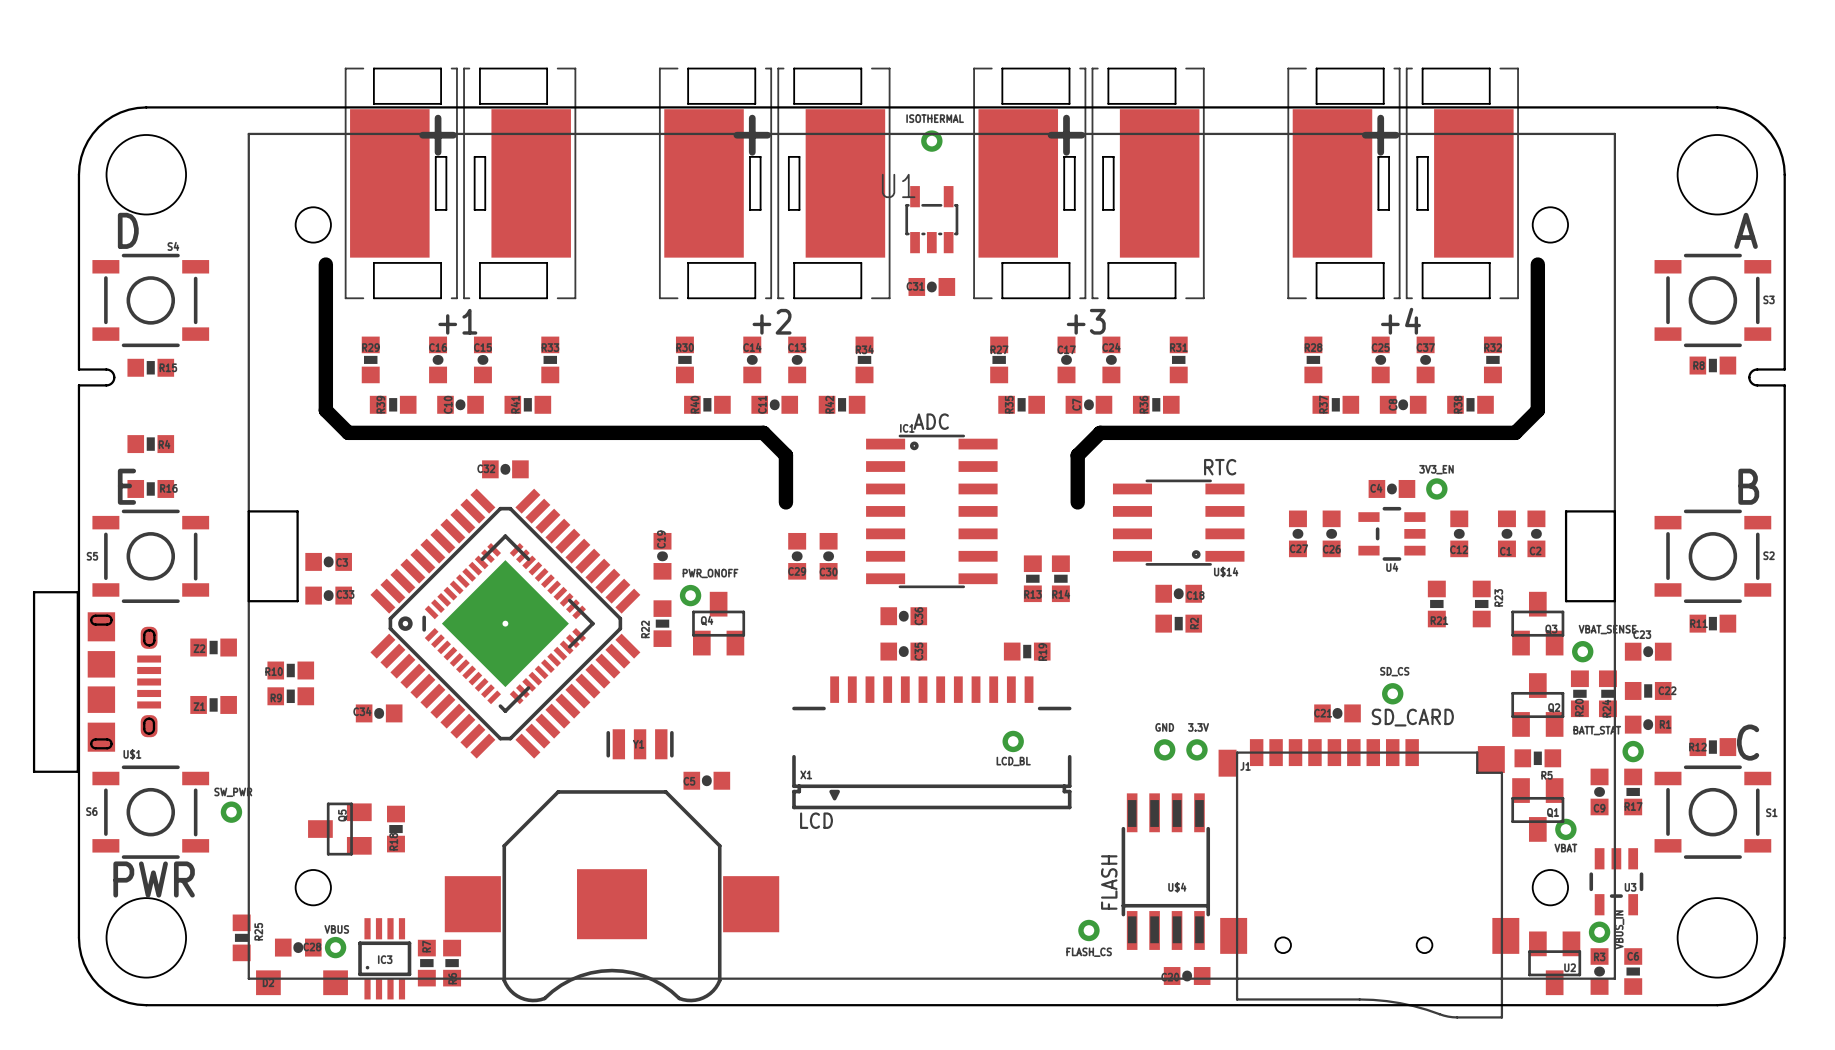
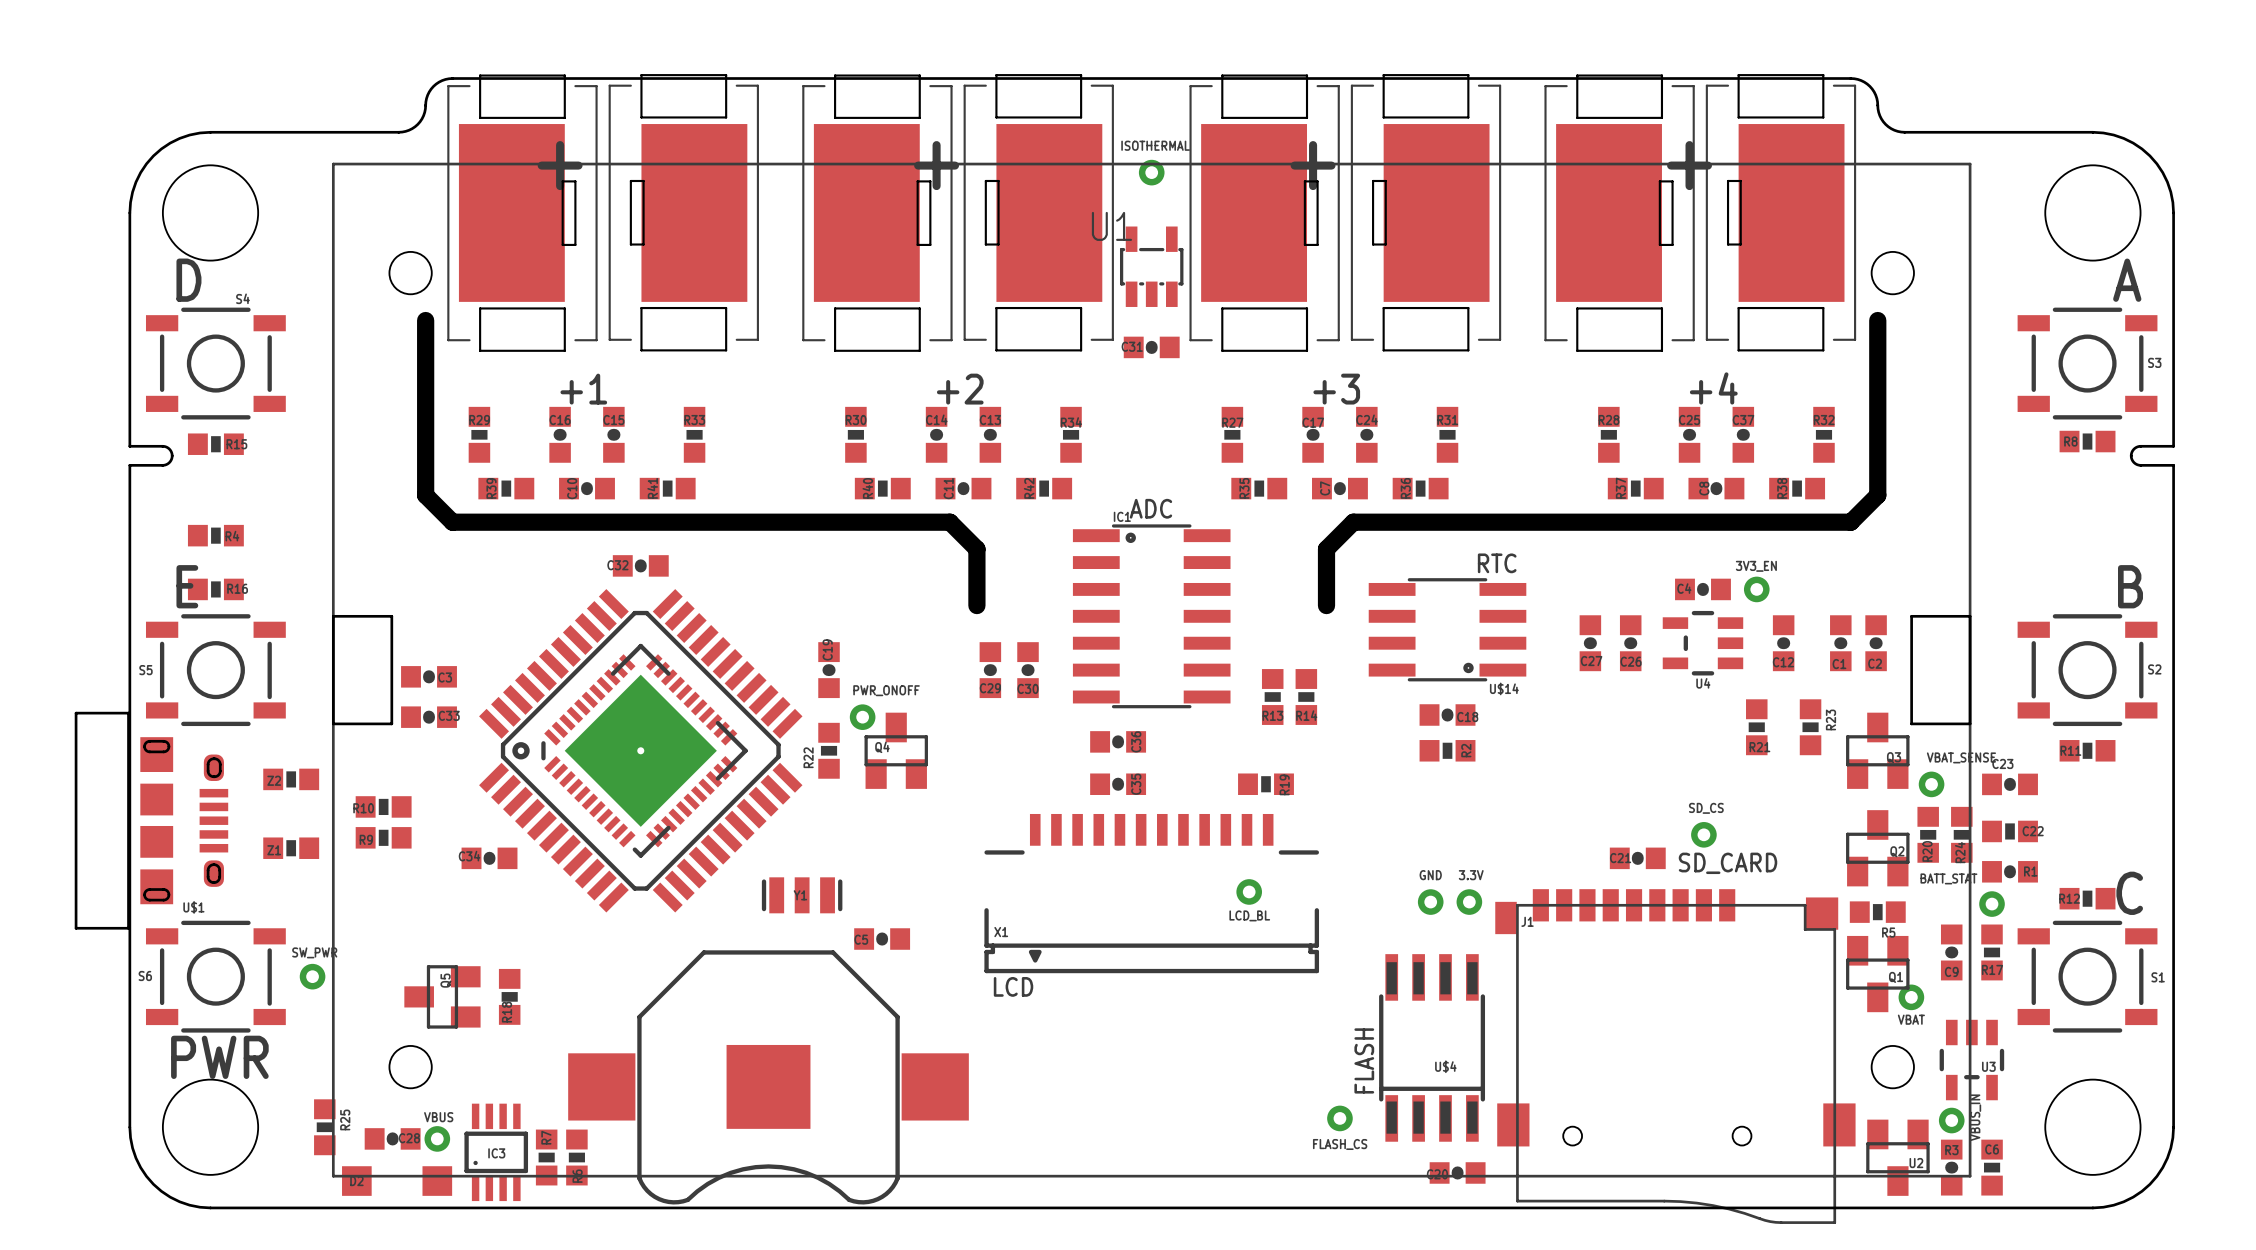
board edge: (303, 107) (1560, 107) -> (398, 132) (409, 130) (417, 124) (423, 115) (426, 98) (431, 89) (439, 82) (452, 78) (1850, 78) (1861, 80) (1869, 86) (1875, 95) (1878, 112) (1883, 121) (1891, 128) (1904, 132)
part: none -> (522, 213)
part: none -> (683, 212)
part: none -> (877, 213)
part: none -> (1038, 212)
part: none -> (1264, 213)
part: none -> (1426, 212)
part: none -> (1619, 213)
part: none -> (1780, 212)
part: (460, 183) -> none
part: (774, 183) -> none
part: (1088, 183) -> none
part: (1403, 183) -> none

